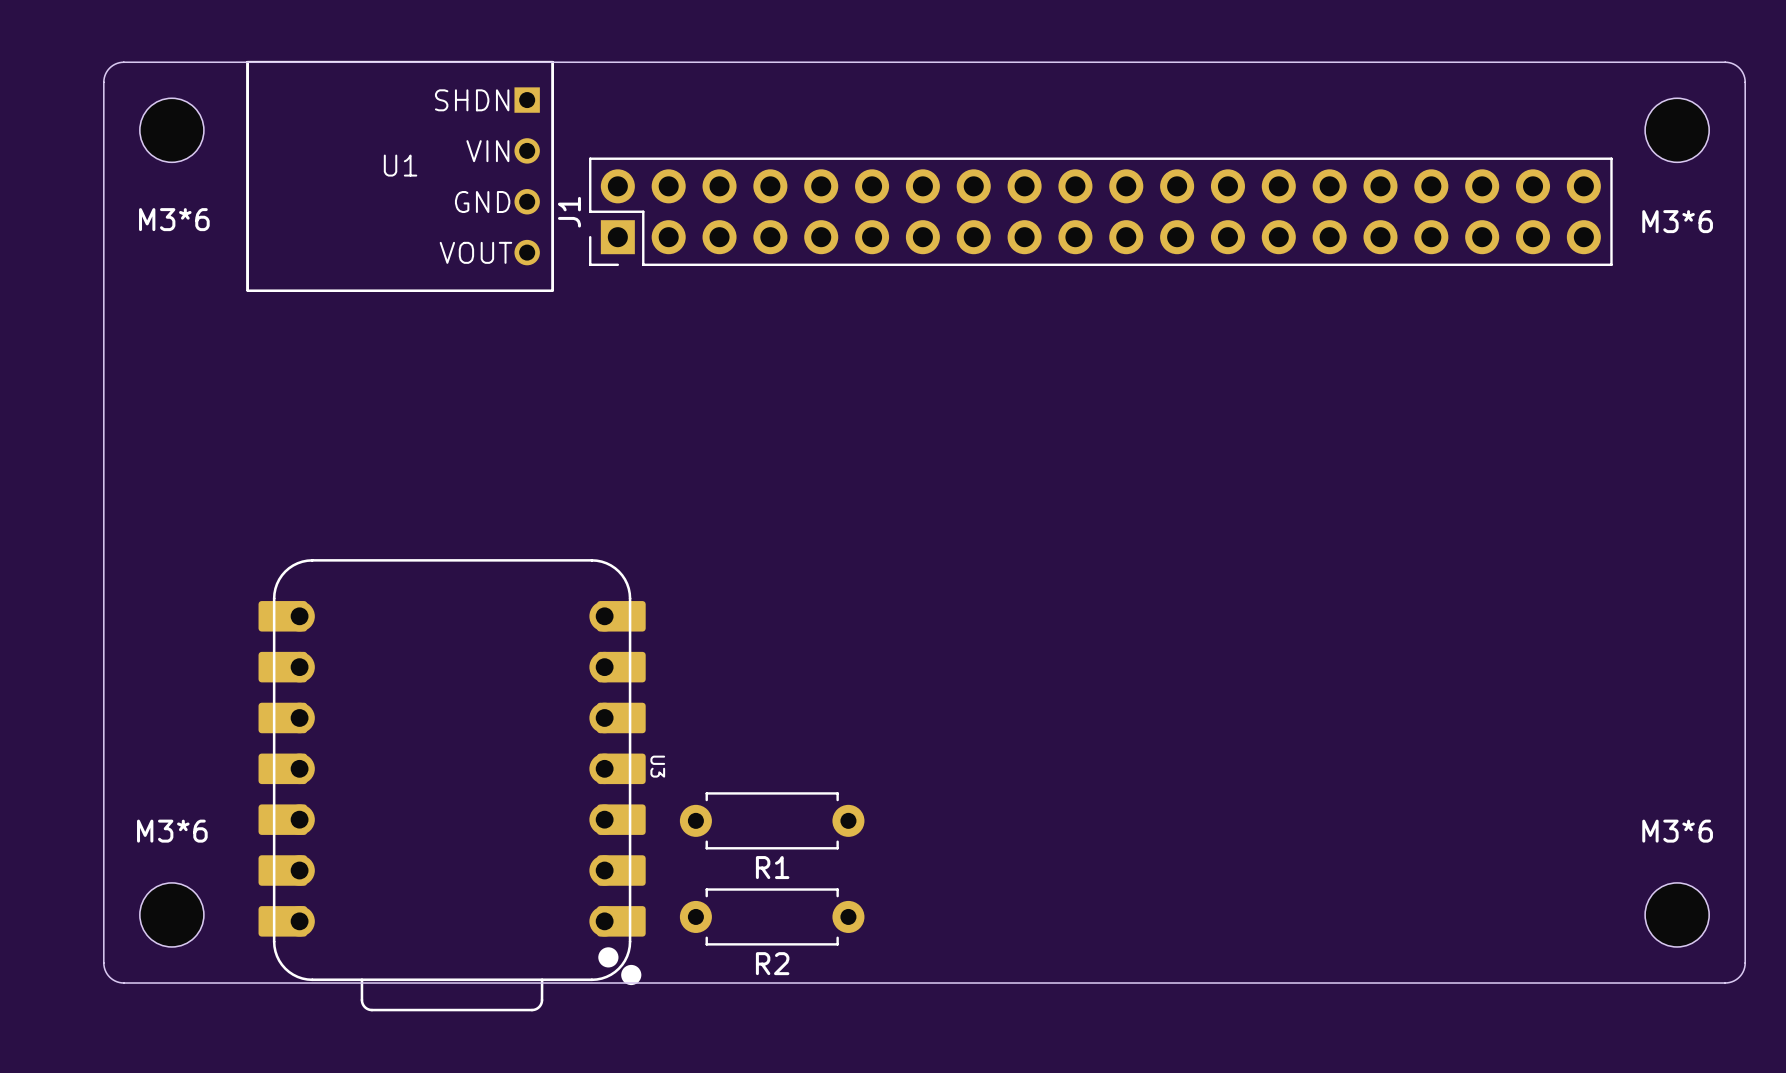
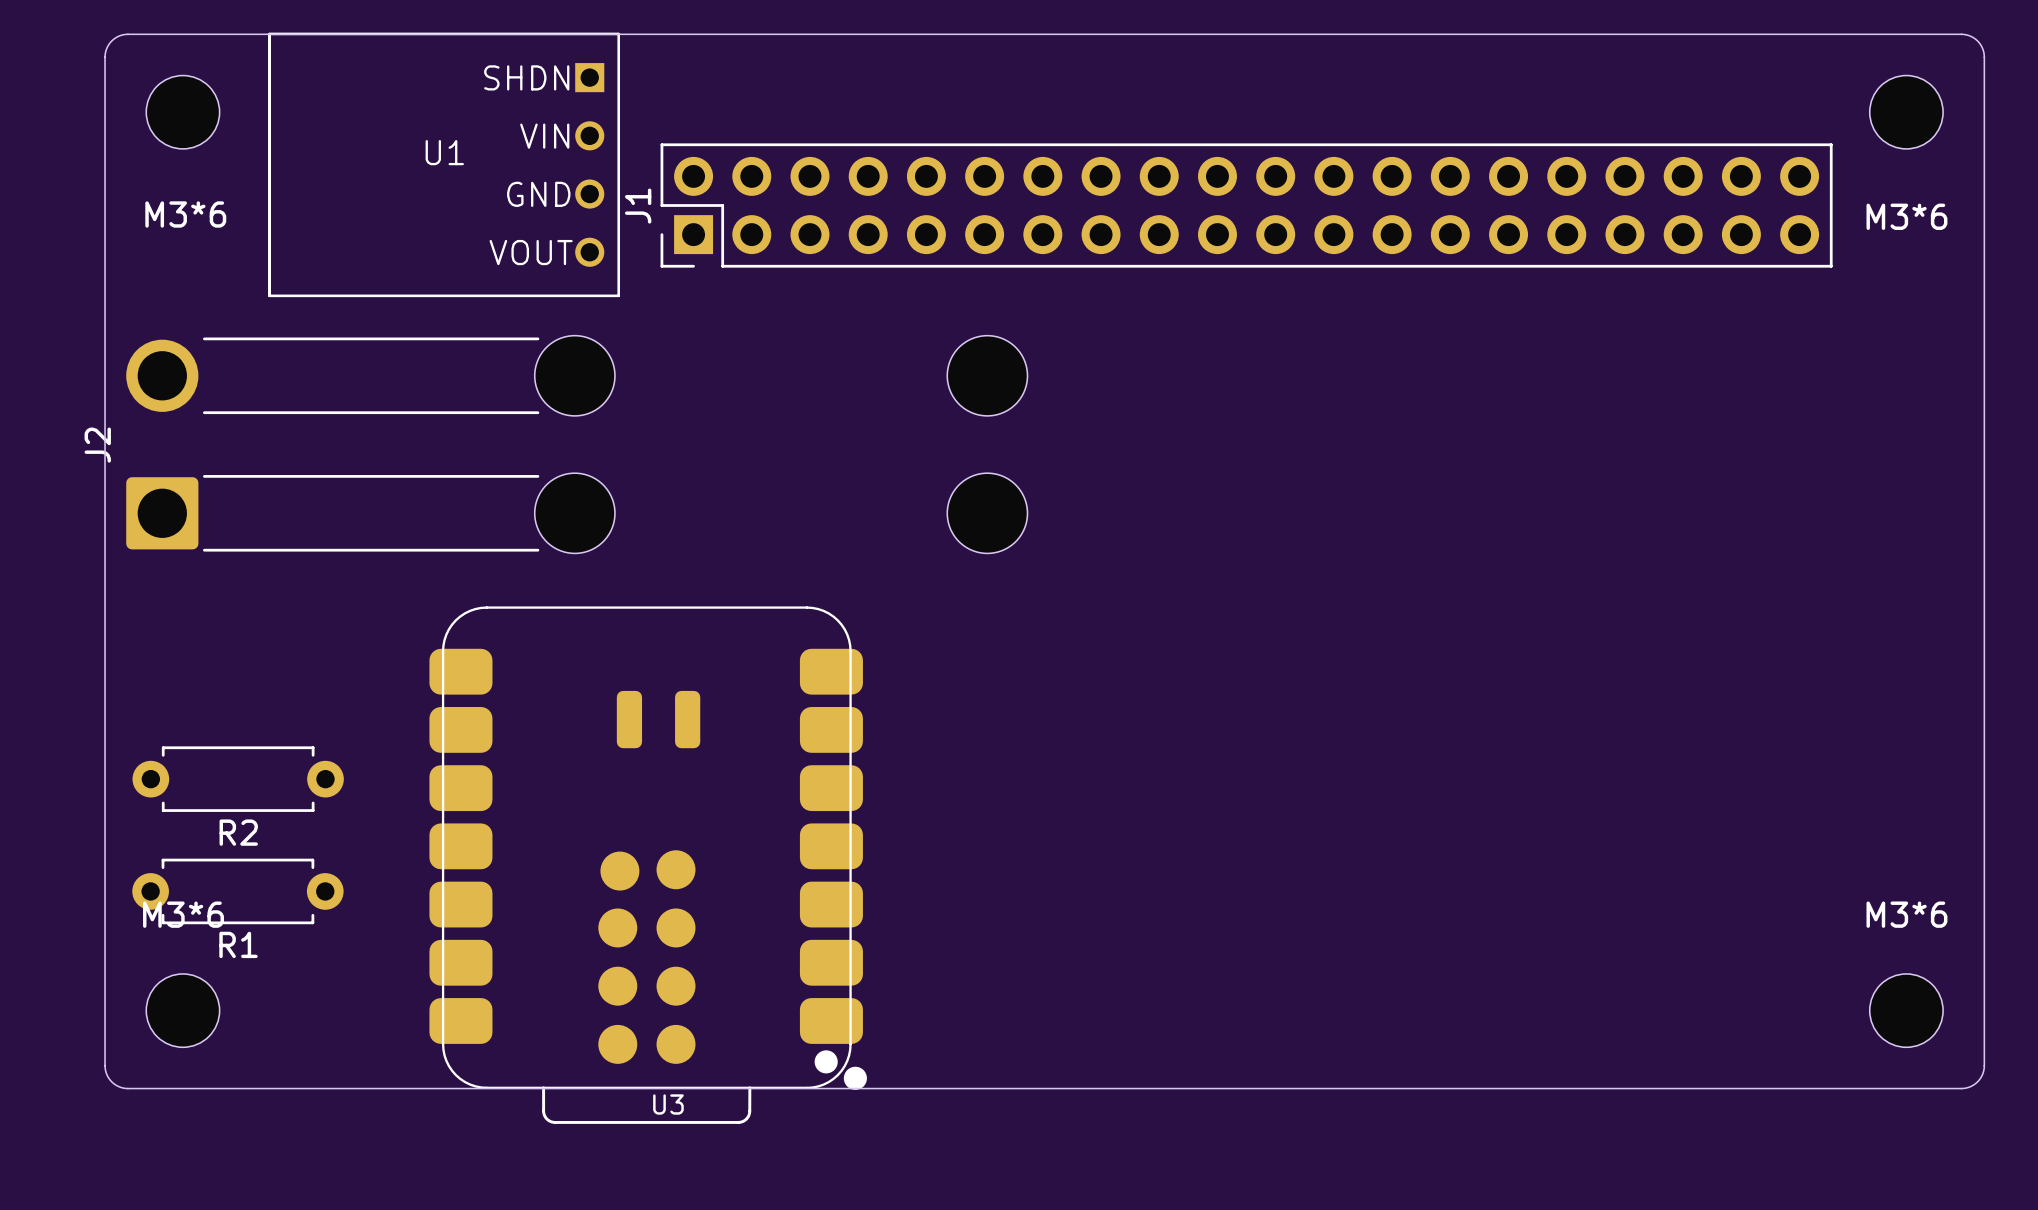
J2: none -> (576, 444)
U3 footprint: [258, 559, 646, 1012] -> [429, 606, 867, 1124]
U3 name position: U3 (657, 766) -> U3 (668, 1104)
R1 position: (772, 820) -> (237, 891)
R2 position: (772, 916) -> (238, 779)

